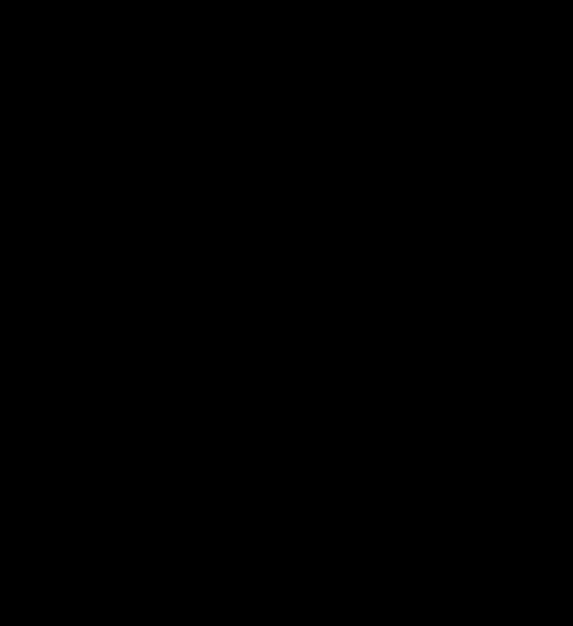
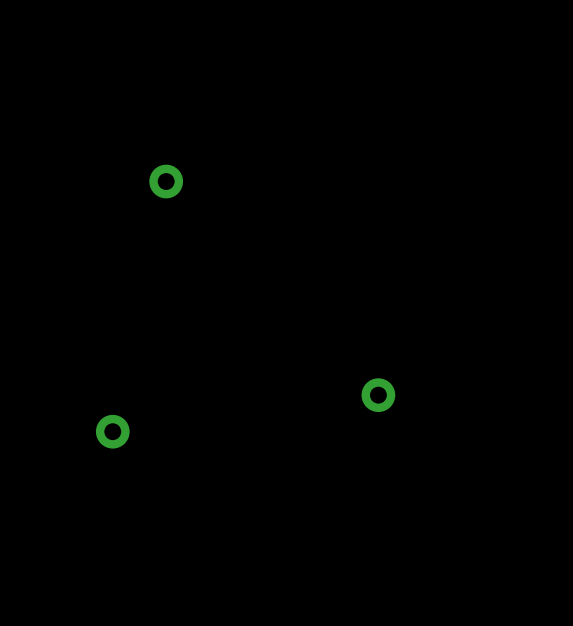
via: none -> (166, 181)
via: none -> (378, 395)
via: none -> (112, 431)

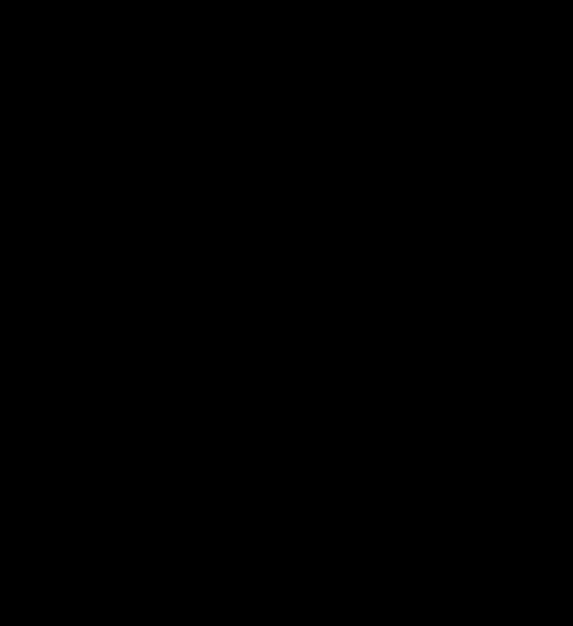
via: (166, 181) -> none
via: (378, 395) -> none
via: (112, 431) -> none

